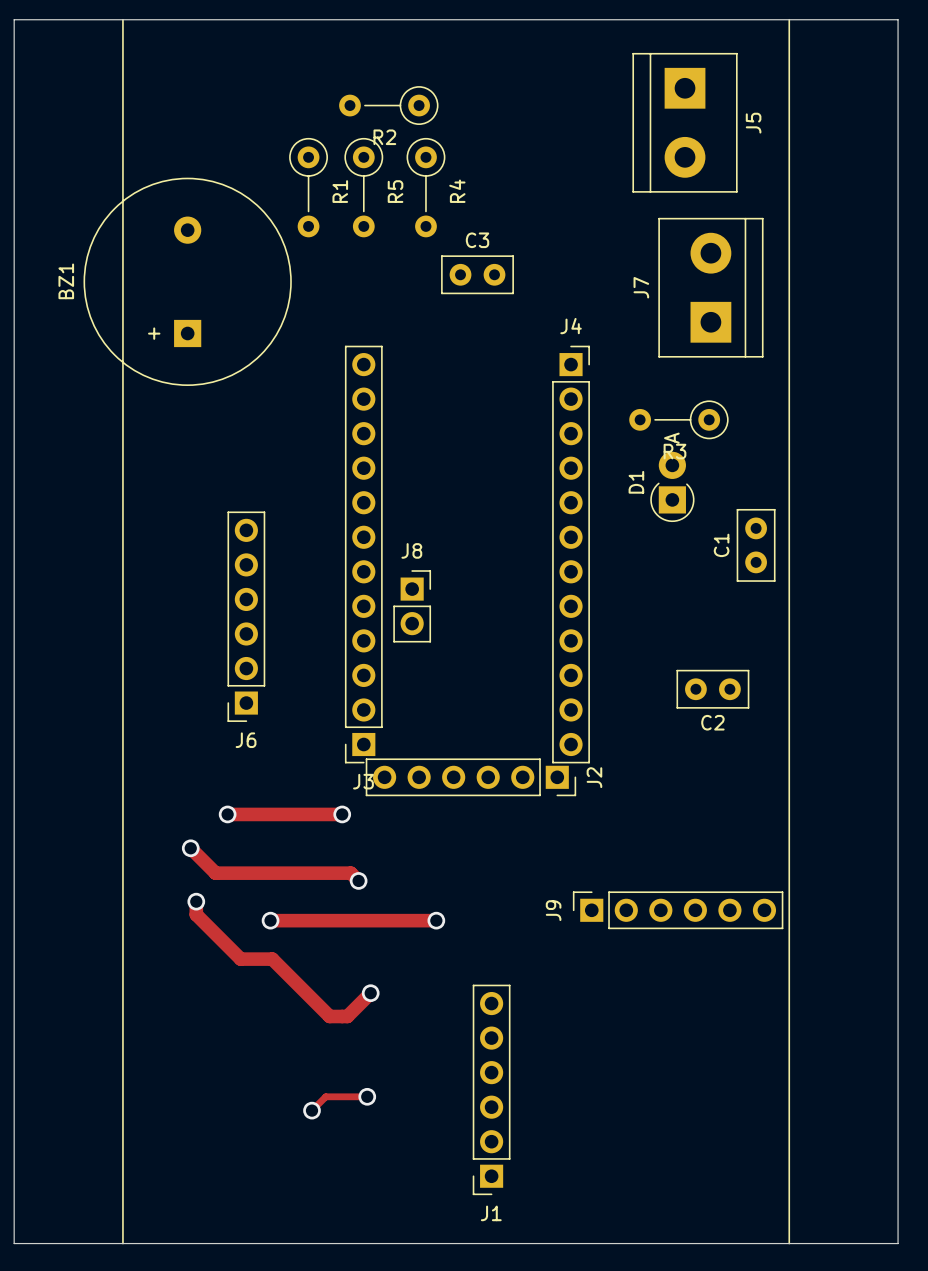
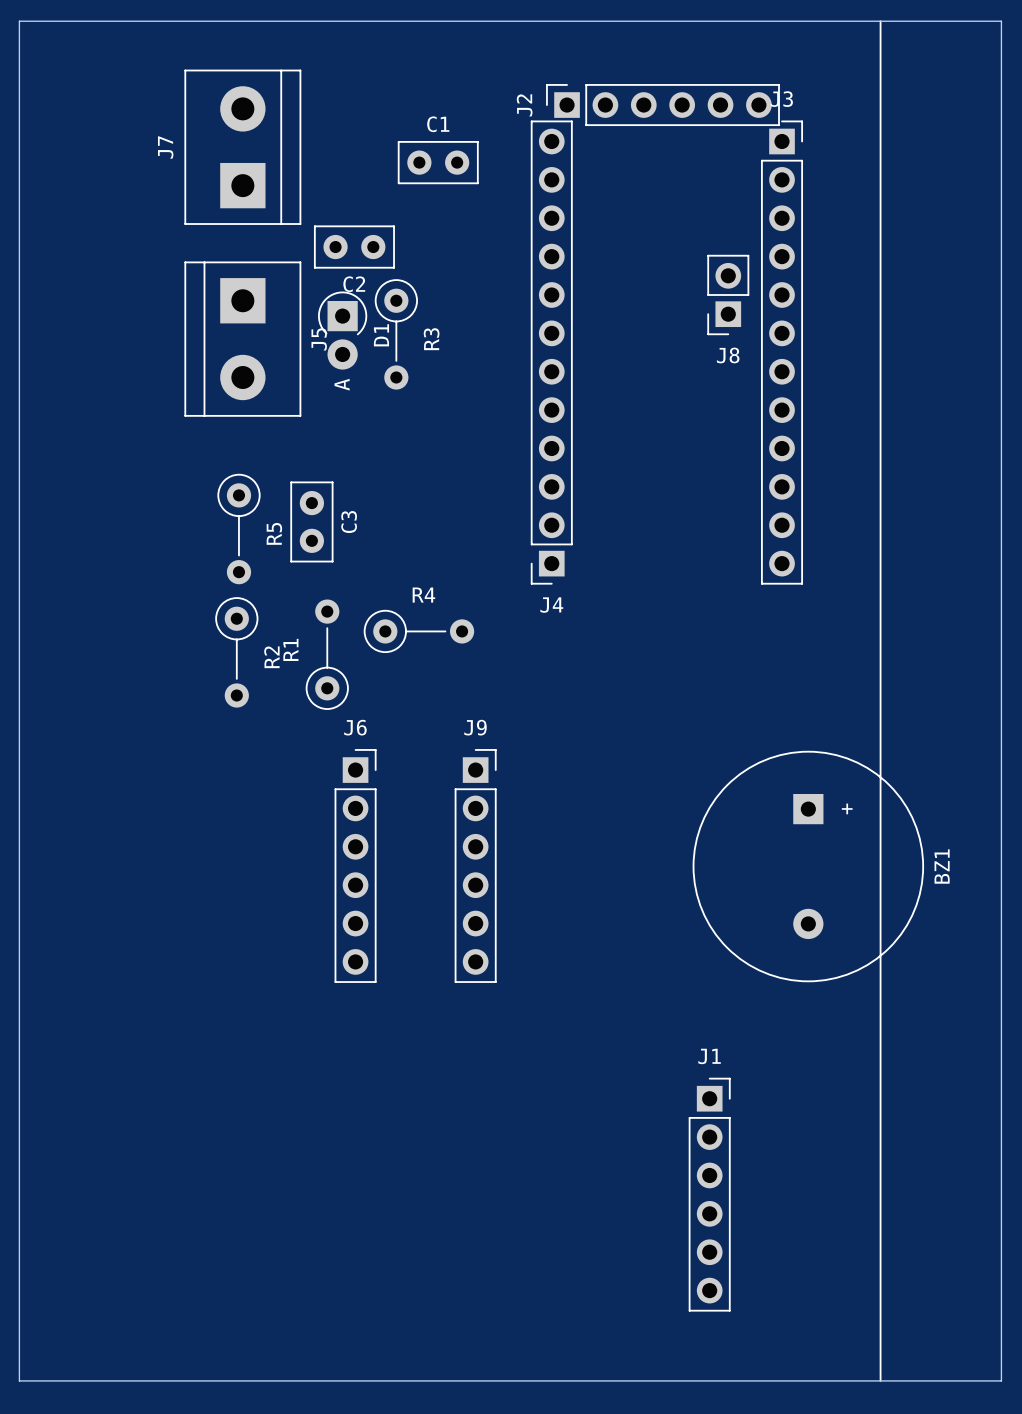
line: (122, 19) (122, 1243) -> none
R2 rotation: 0° (388, 105) -> 90° counterclockwise (236, 652)
R2 position: (388, 105) -> (236, 652)
J5 position: (685, 122) -> (242, 339)
R1 rotation: 0° (308, 187) -> 180° (327, 654)
R1 position: (308, 187) -> (327, 654)
R5 position: (363, 187) -> (238, 529)
R4 rotation: 0° (425, 187) -> 90° counterclockwise (418, 631)
R4 position: (425, 187) -> (418, 631)
C3 rotation: 0° (477, 274) -> 90° clockwise (311, 521)
C3 position: (477, 274) -> (311, 521)
BZ1 rotation: 0° (187, 281) -> 180° (808, 866)
BZ1 position: (187, 281) -> (808, 866)
J7 position: (710, 287) -> (242, 147)
R3 rotation: 0° (678, 419) -> 90° counterclockwise (396, 334)
R3 position: (678, 419) -> (396, 334)
D1 rotation: 0° (672, 486) -> 180° (342, 330)
D1 position: (672, 486) -> (342, 330)
C1 rotation: 0° (756, 545) -> 90° clockwise (438, 162)
C1 position: (756, 545) -> (438, 162)
J3 rotation: 0° (363, 554) -> 180° (782, 352)
J3 position: (363, 554) -> (782, 352)
J4 rotation: 0° (571, 554) -> 180° (551, 352)
J8 rotation: 0° (412, 606) -> 180° (728, 294)
J8 position: (412, 606) -> (728, 294)
J6 rotation: 0° (246, 616) -> 180° (355, 865)
J6 position: (246, 616) -> (355, 865)
C2 position: (712, 689) -> (354, 247)
J2 rotation: 0° (470, 777) -> 180° (662, 105)
J2 position: (470, 777) -> (662, 105)
track: (227, 814) (342, 814) -> none
via: (227, 814) -> none
via: (342, 814) -> none
track: (190, 848) (215, 873) (350, 873) (358, 880) -> none
via: (190, 848) -> none
via: (358, 880) -> none
track: (196, 901) (196, 914) (240, 959) (272, 959) (329, 1016) (347, 1016) (370, 993) -> none
via: (196, 901) -> none
J9 rotation: 0° (678, 910) -> 90° clockwise (475, 865)
J9 position: (678, 910) -> (475, 865)
track: (270, 920) (436, 920) -> none
via: (270, 920) -> none
via: (436, 920) -> none
via: (370, 993) -> none
J1 rotation: 0° (491, 1089) -> 180° (709, 1194)
J1 position: (491, 1089) -> (709, 1194)
track: (367, 1096) (325, 1096) (312, 1110) -> none
via: (367, 1096) -> none
via: (312, 1110) -> none

